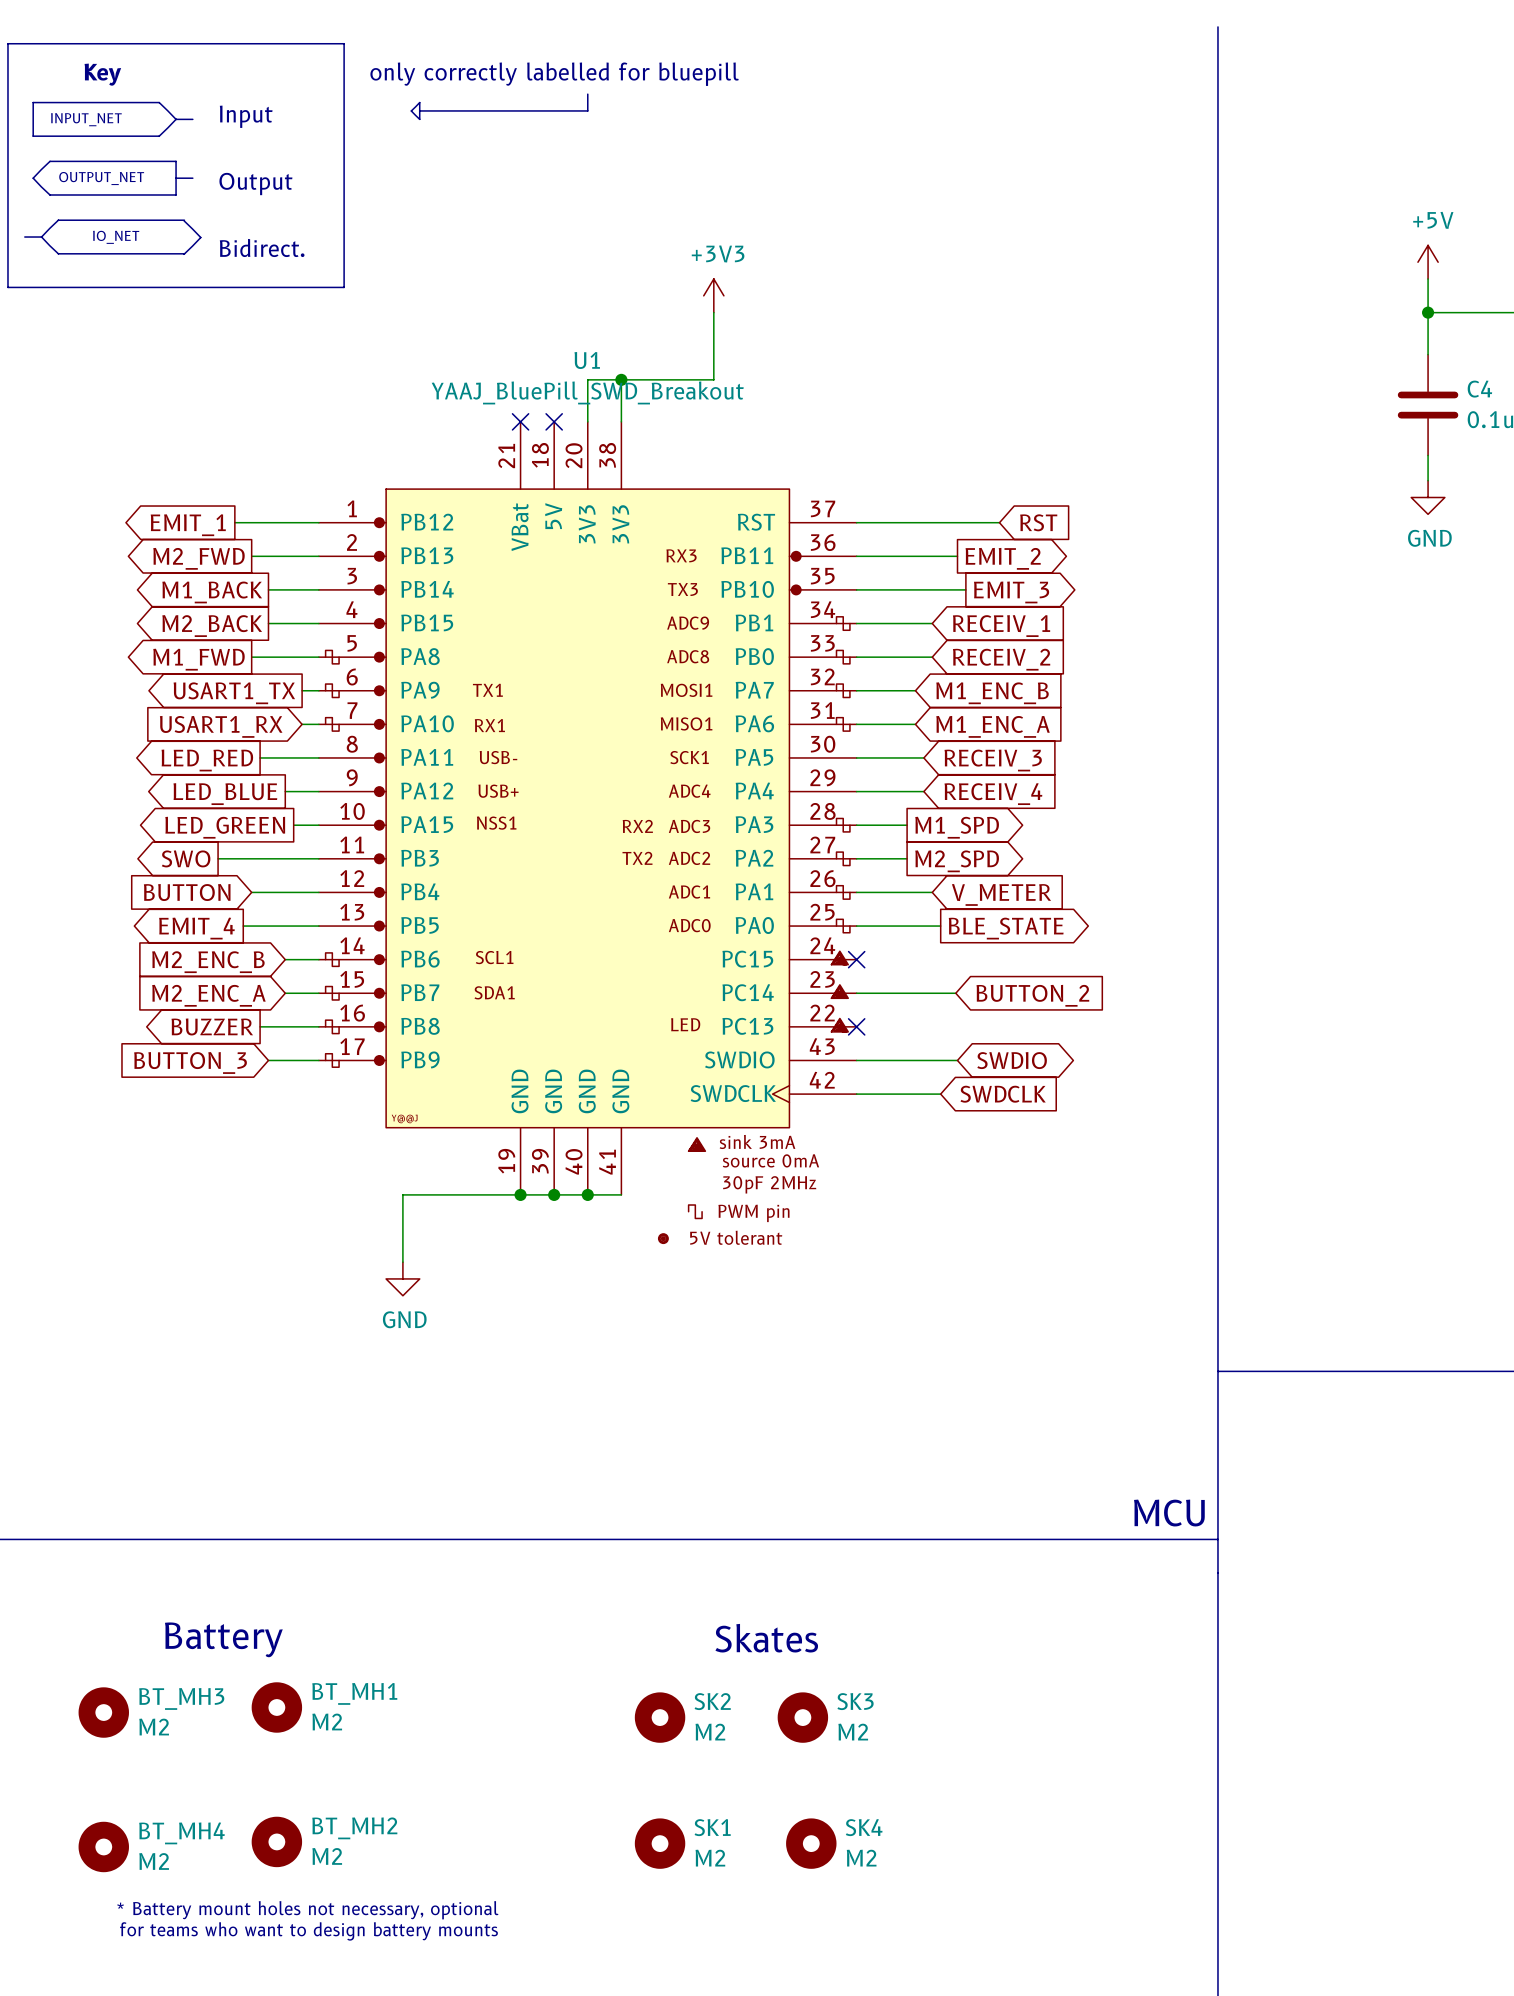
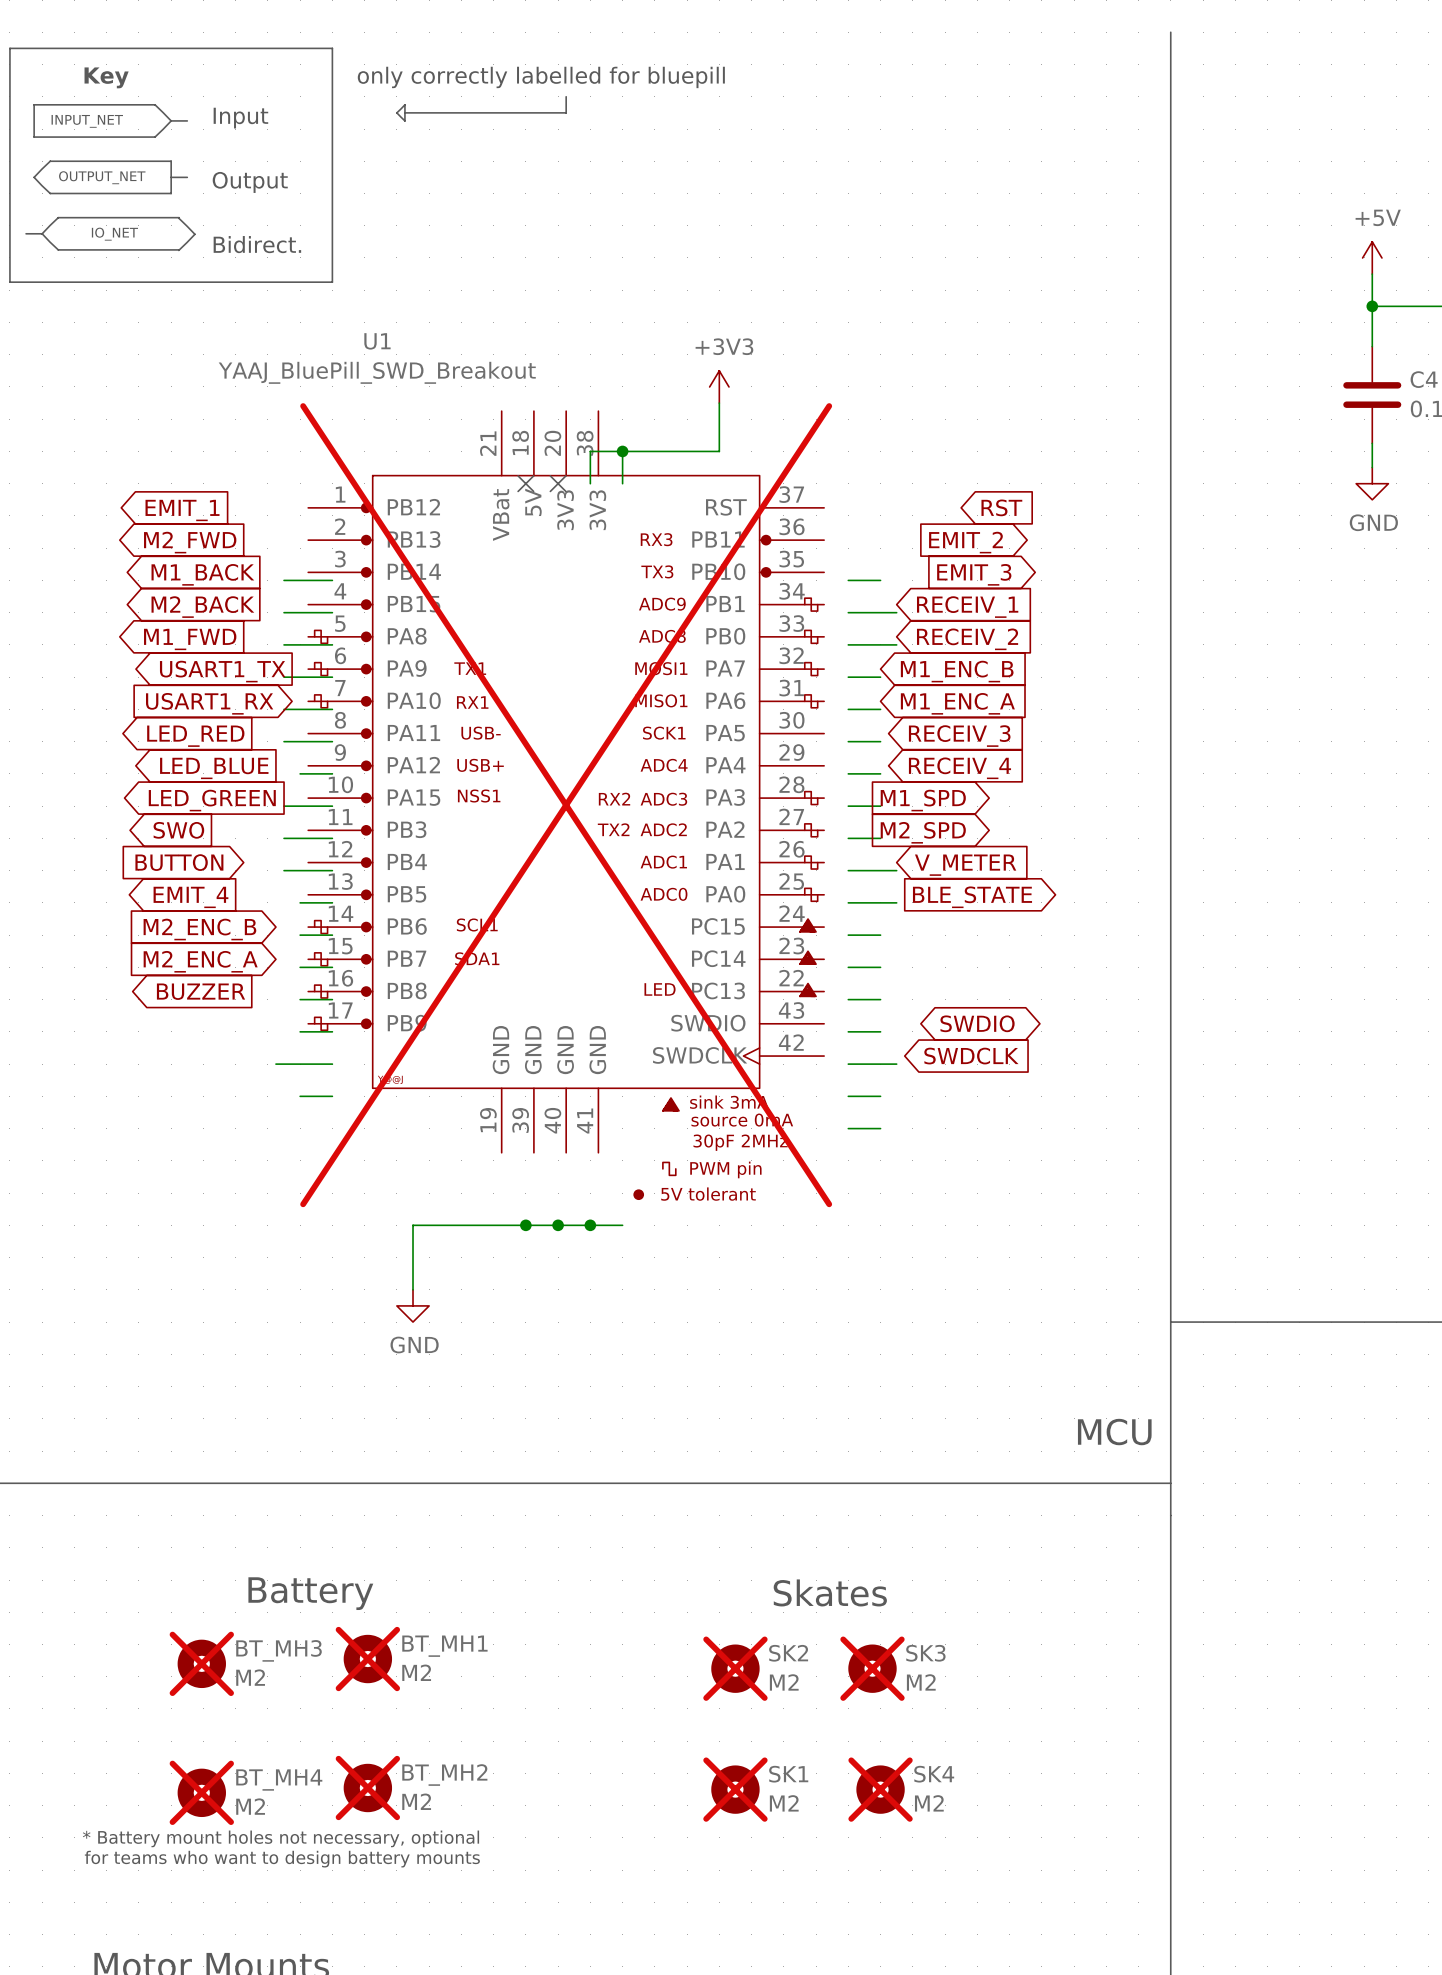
power symbol position: +3V3 (713, 295) -> +3V3 (719, 386)
wire: (713, 312) (713, 379) (587, 379) (587, 421) -> none
U1 name position: U1 (587, 360) -> U1 (377, 341)
wire: (621, 379) (621, 421) -> none
junction: (621, 379) -> none
U1 value position: YAAJ_BluePill_SWD_Breakout (587, 392) -> YAAJ_BluePill_SWD_Breakout (377, 372)
wire: none -> (719, 403) (719, 451) (590, 451) (590, 483)
no-connect mark: (520, 421) -> none
no-connect mark: (554, 421) -> none
wire: none -> (622, 451) (622, 483)
junction: none -> (622, 451)
no-connect mark: none -> (525, 483)
no-connect mark: none -> (558, 483)
wire: (234, 522) (318, 522) -> none
wire: (856, 522) (999, 522) -> none
wire: (251, 556) (318, 556) -> none
wire: (856, 556) (957, 556) -> none
wire: (268, 589) (318, 589) -> (284, 644) (332, 644)
wire: (856, 589) (965, 589) -> none
wire: none -> (284, 580) (332, 580)
wire: none -> (848, 580) (880, 580)
wire: (268, 623) (318, 623) -> (284, 677) (332, 677)
wire: (856, 623) (932, 623) -> none
wire: none -> (284, 612) (332, 612)
wire: none -> (848, 612) (896, 612)
wire: (251, 657) (318, 657) -> none
wire: (856, 657) (932, 657) -> none
wire: none -> (848, 644) (896, 644)
wire: (302, 690) (318, 690) -> none
wire: (856, 690) (915, 690) -> none
wire: none -> (848, 677) (880, 677)
wire: (302, 724) (318, 724) -> none
wire: (856, 724) (915, 724) -> none
wire: none -> (284, 709) (332, 709)
wire: none -> (848, 709) (880, 709)
wire: (260, 757) (318, 757) -> none
wire: (856, 757) (923, 757) -> none
wire: none -> (284, 741) (332, 741)
wire: none -> (848, 741) (880, 741)
wire: (285, 791) (318, 791) -> (300, 773) (332, 773)
wire: (856, 791) (923, 791) -> none
wire: none -> (848, 773) (880, 773)
wire: (293, 825) (318, 825) -> none
wire: (856, 825) (907, 825) -> (848, 870) (896, 870)
U1 do-not-place cross: none -> (566, 805)
wire: none -> (284, 806) (332, 806)
wire: none -> (848, 806) (880, 806)
wire: (218, 858) (318, 858) -> none
wire: (856, 858) (907, 858) -> (848, 902) (896, 902)
wire: none -> (848, 838) (880, 838)
wire: (251, 892) (318, 892) -> none
wire: (856, 892) (932, 892) -> none
wire: none -> (284, 870) (332, 870)
wire: (243, 926) (318, 926) -> none
wire: (856, 926) (940, 926) -> none
wire: none -> (300, 902) (332, 902)
wire: (285, 959) (318, 959) -> (300, 999) (332, 999)
no-connect mark: (856, 959) -> none
wire: none -> (300, 935) (332, 935)
wire: none -> (848, 935) (880, 935)
wire: (285, 993) (318, 993) -> (300, 1031) (332, 1031)
wire: (856, 993) (955, 993) -> none
global label: BUTTON_2 (1032, 995) -> none
wire: none -> (300, 967) (332, 967)
wire: none -> (848, 967) (880, 967)
wire: (260, 1026) (318, 1026) -> (275, 1064) (332, 1064)
no-connect mark: (856, 1026) -> none
wire: none -> (848, 999) (880, 999)
wire: (268, 1060) (318, 1060) -> (284, 838) (332, 838)
wire: (856, 1060) (957, 1060) -> none
global label: BUTTON_3 (190, 1062) -> none
wire: none -> (848, 1031) (880, 1031)
wire: (856, 1094) (940, 1094) -> none
wire: none -> (848, 1064) (896, 1064)
wire: none -> (300, 1096) (332, 1096)
wire: none -> (848, 1096) (880, 1096)
wire: none -> (848, 1128) (880, 1128)
junction: (520, 1194) -> none
junction: (554, 1194) -> none
junction: (587, 1194) -> none
wire: (621, 1194) (402, 1194) (402, 1262) -> (622, 1225) (413, 1225) (413, 1289)
junction: none -> (525, 1225)
junction: none -> (558, 1225)
junction: none -> (590, 1225)
power symbol position: GND (402, 1278) -> GND (413, 1305)
text position: MCU (1169, 1513) -> MCU (1114, 1432)
text position: Skates (766, 1638) -> Skates (830, 1592)
text position: Battery (223, 1639) -> Battery (310, 1593)
BT_MH1 position: (276, 1707) -> (367, 1659)
BT_MH3 position: (103, 1712) -> (201, 1663)
SK2 position: (660, 1717) -> (735, 1668)
SK3 position: (802, 1717) -> (872, 1668)
BT_MH1 do-not-place cross: none -> (367, 1659)
BT_MH3 do-not-place cross: none -> (201, 1663)
SK2 do-not-place cross: none -> (735, 1668)
SK3 do-not-place cross: none -> (872, 1668)
BT_MH2 position: (276, 1841) -> (367, 1787)
SK1 position: (660, 1843) -> (735, 1789)
SK4 position: (811, 1843) -> (880, 1789)
BT_MH4 position: (103, 1846) -> (201, 1792)
BT_MH2 do-not-place cross: none -> (367, 1787)
SK1 do-not-place cross: none -> (735, 1789)
SK4 do-not-place cross: none -> (880, 1789)
BT_MH4 do-not-place cross: none -> (201, 1792)

